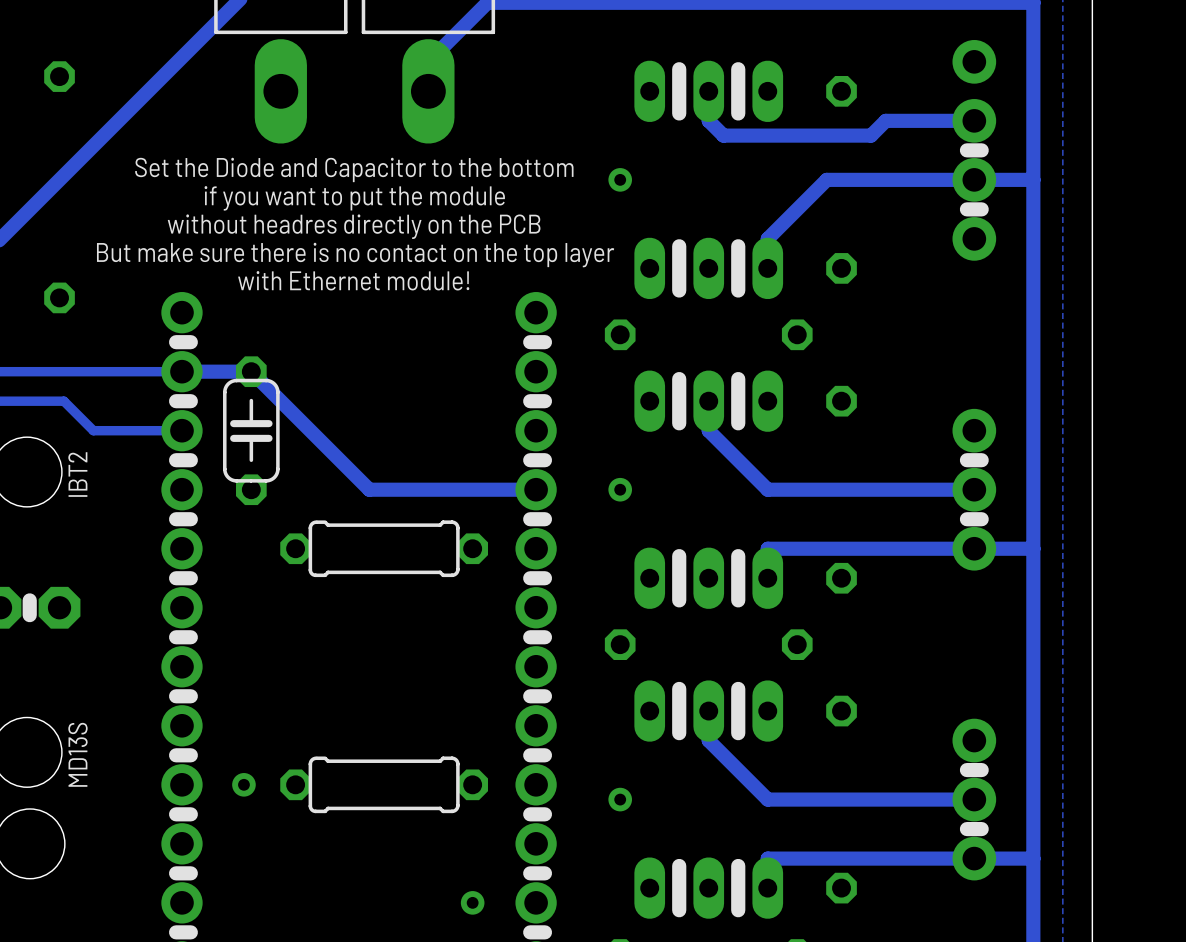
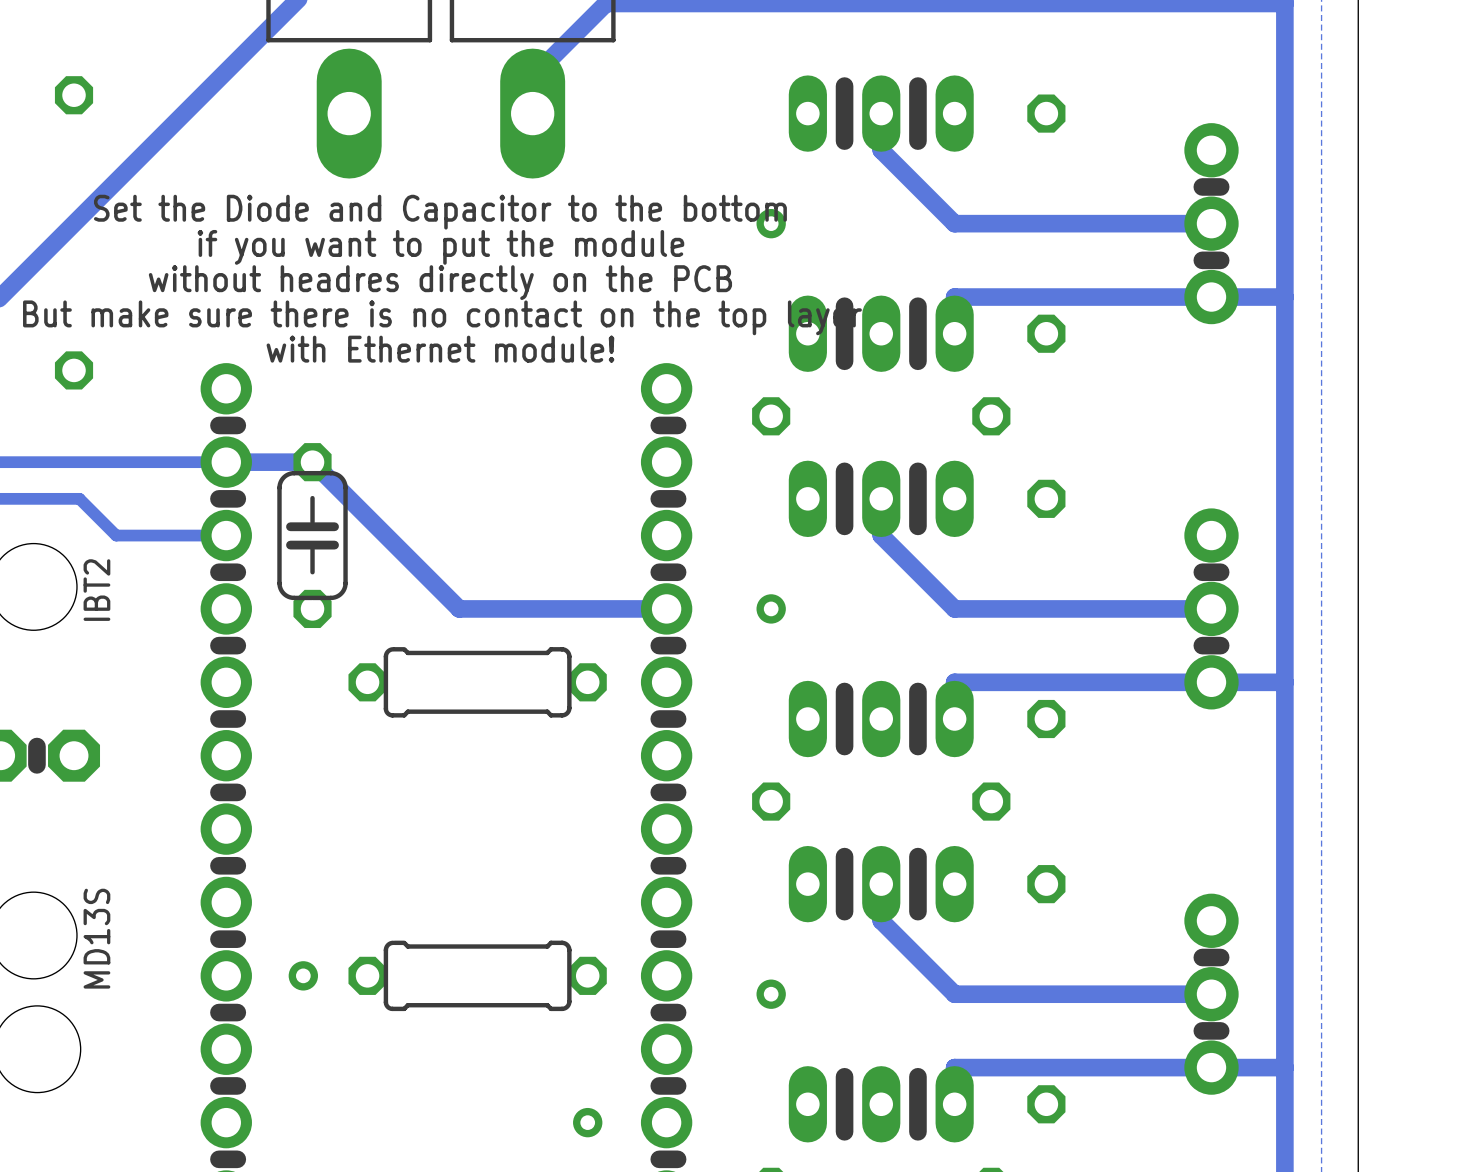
track: (974, 120) (885, 120) (871, 135) (723, 135) -> none
part: (974, 150) -> none
track: (826, 179) (767, 238) -> (1028, 223) (954, 223) (899, 168)
part: none -> (1211, 223)
track: (1033, 179) (974, 179) -> none
track: none -> (1284, 297) (954, 297)

